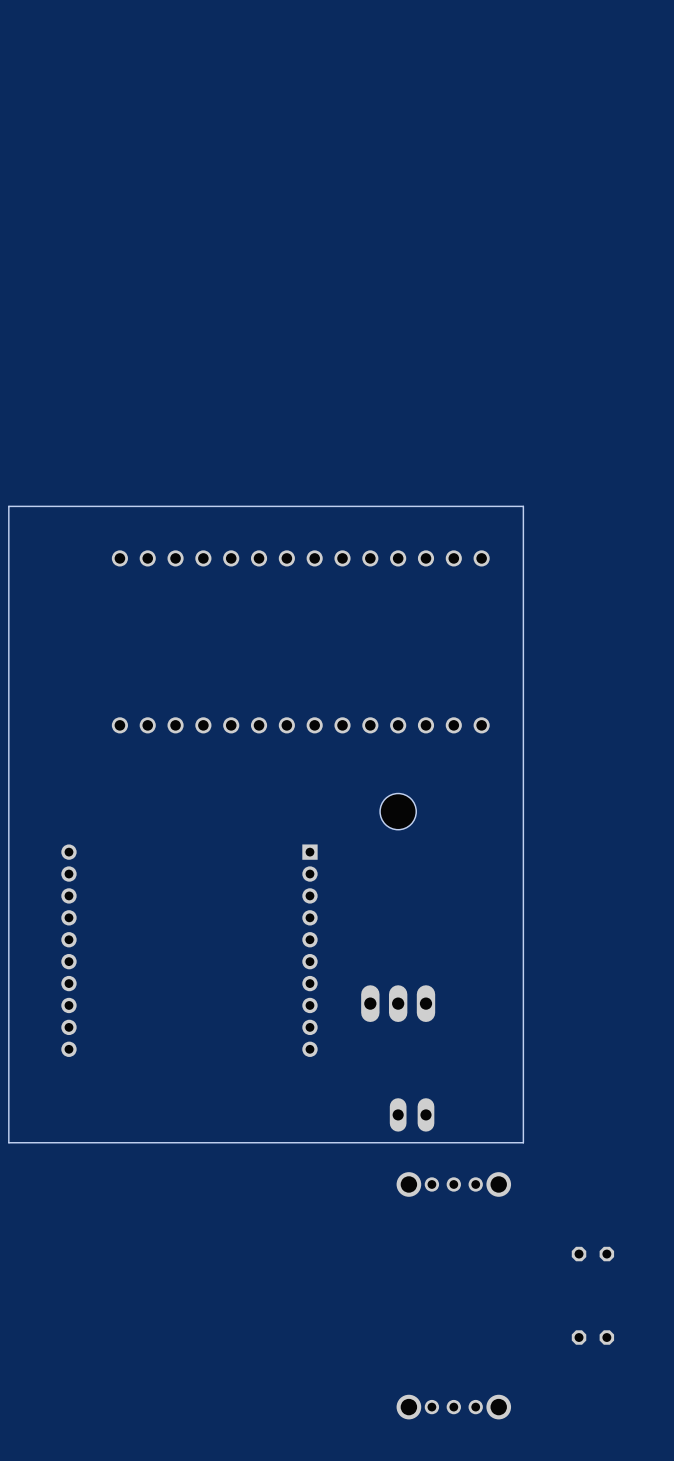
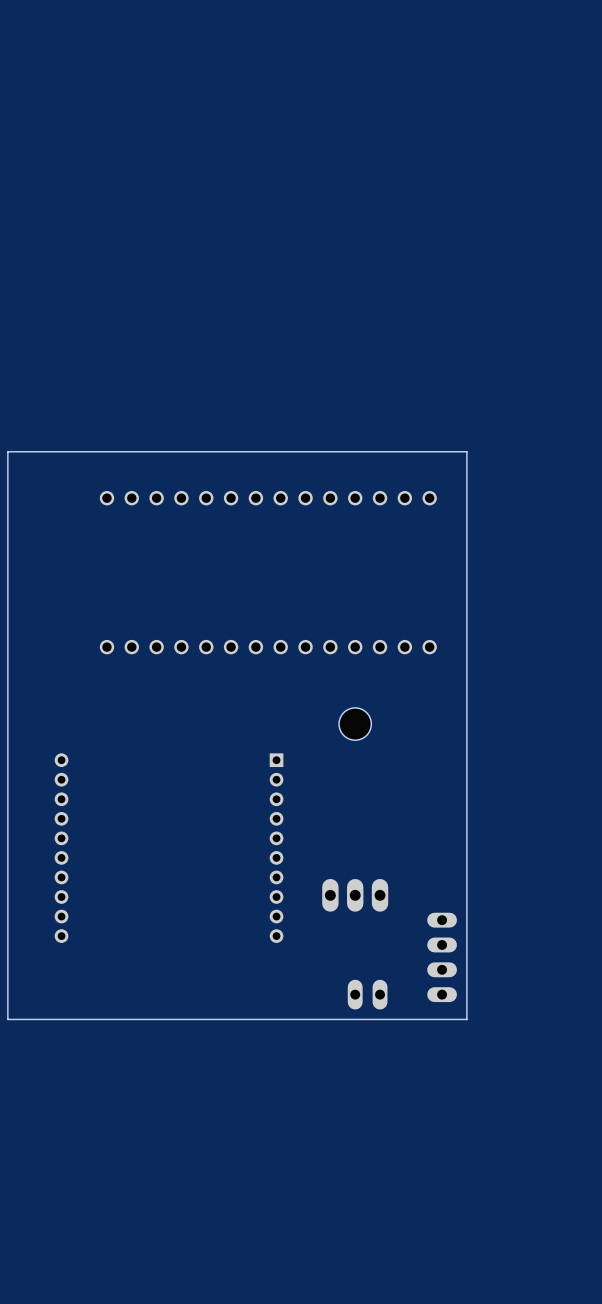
part: none -> (442, 957)
part: (453, 1184) -> none
part: (592, 1254) -> none
part: (592, 1337) -> none
part: (453, 1407) -> none

